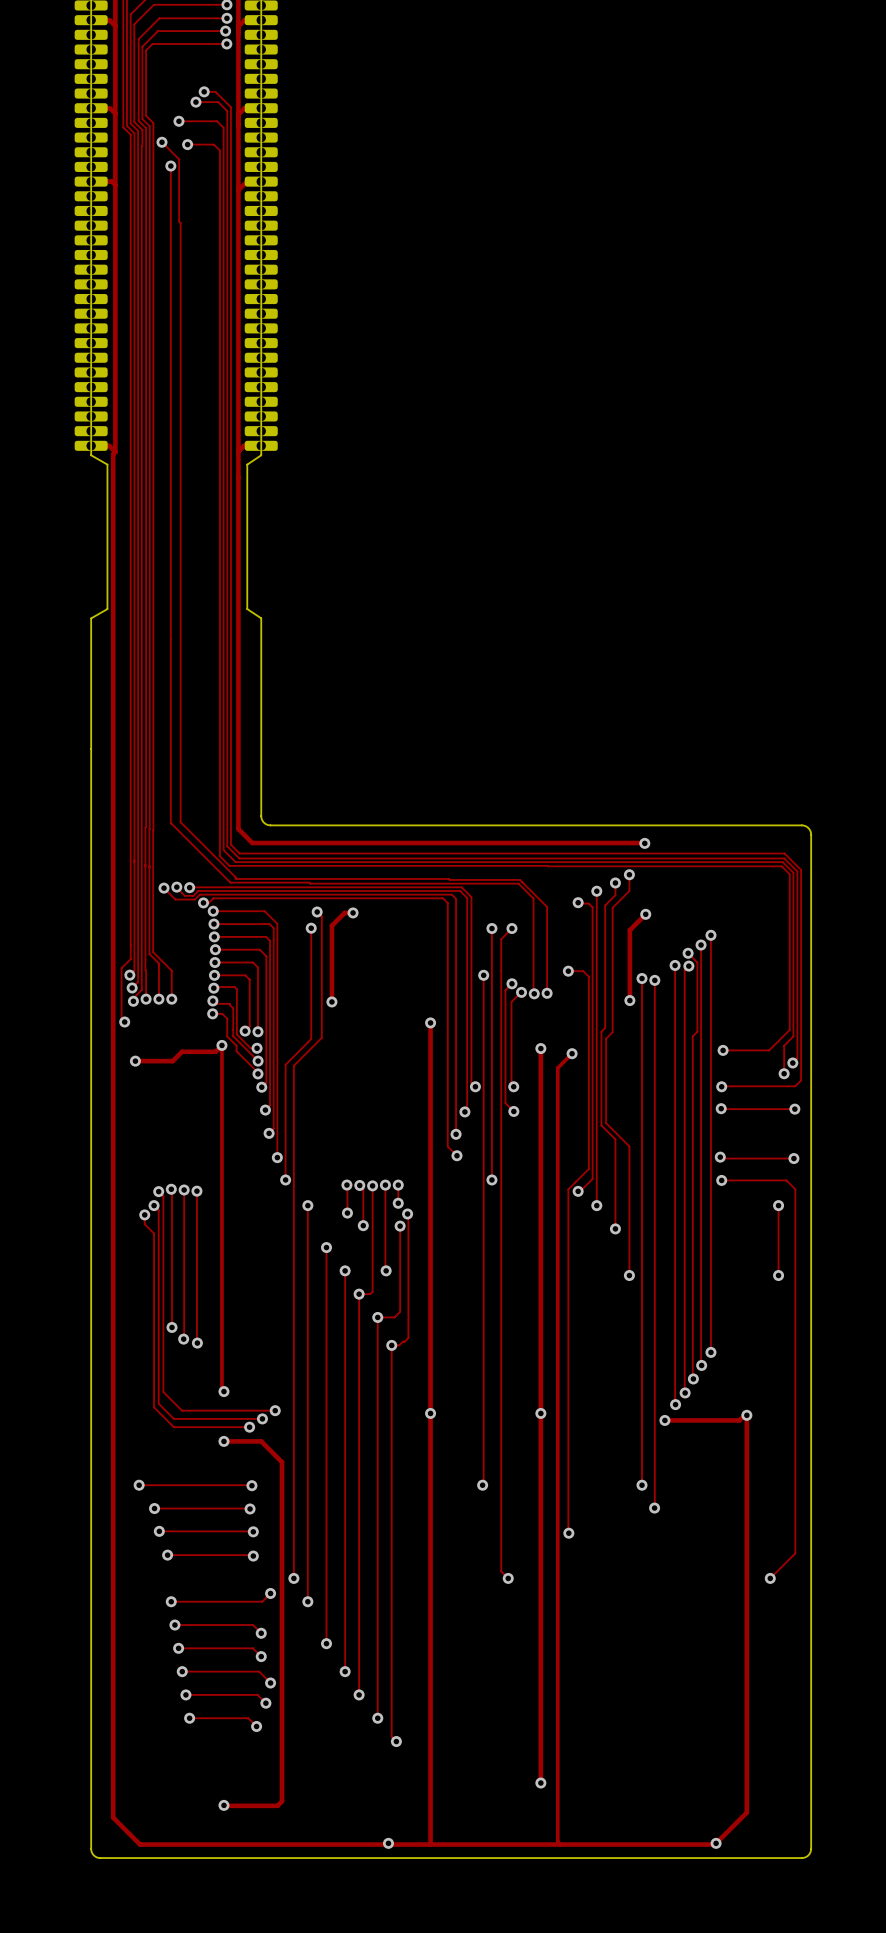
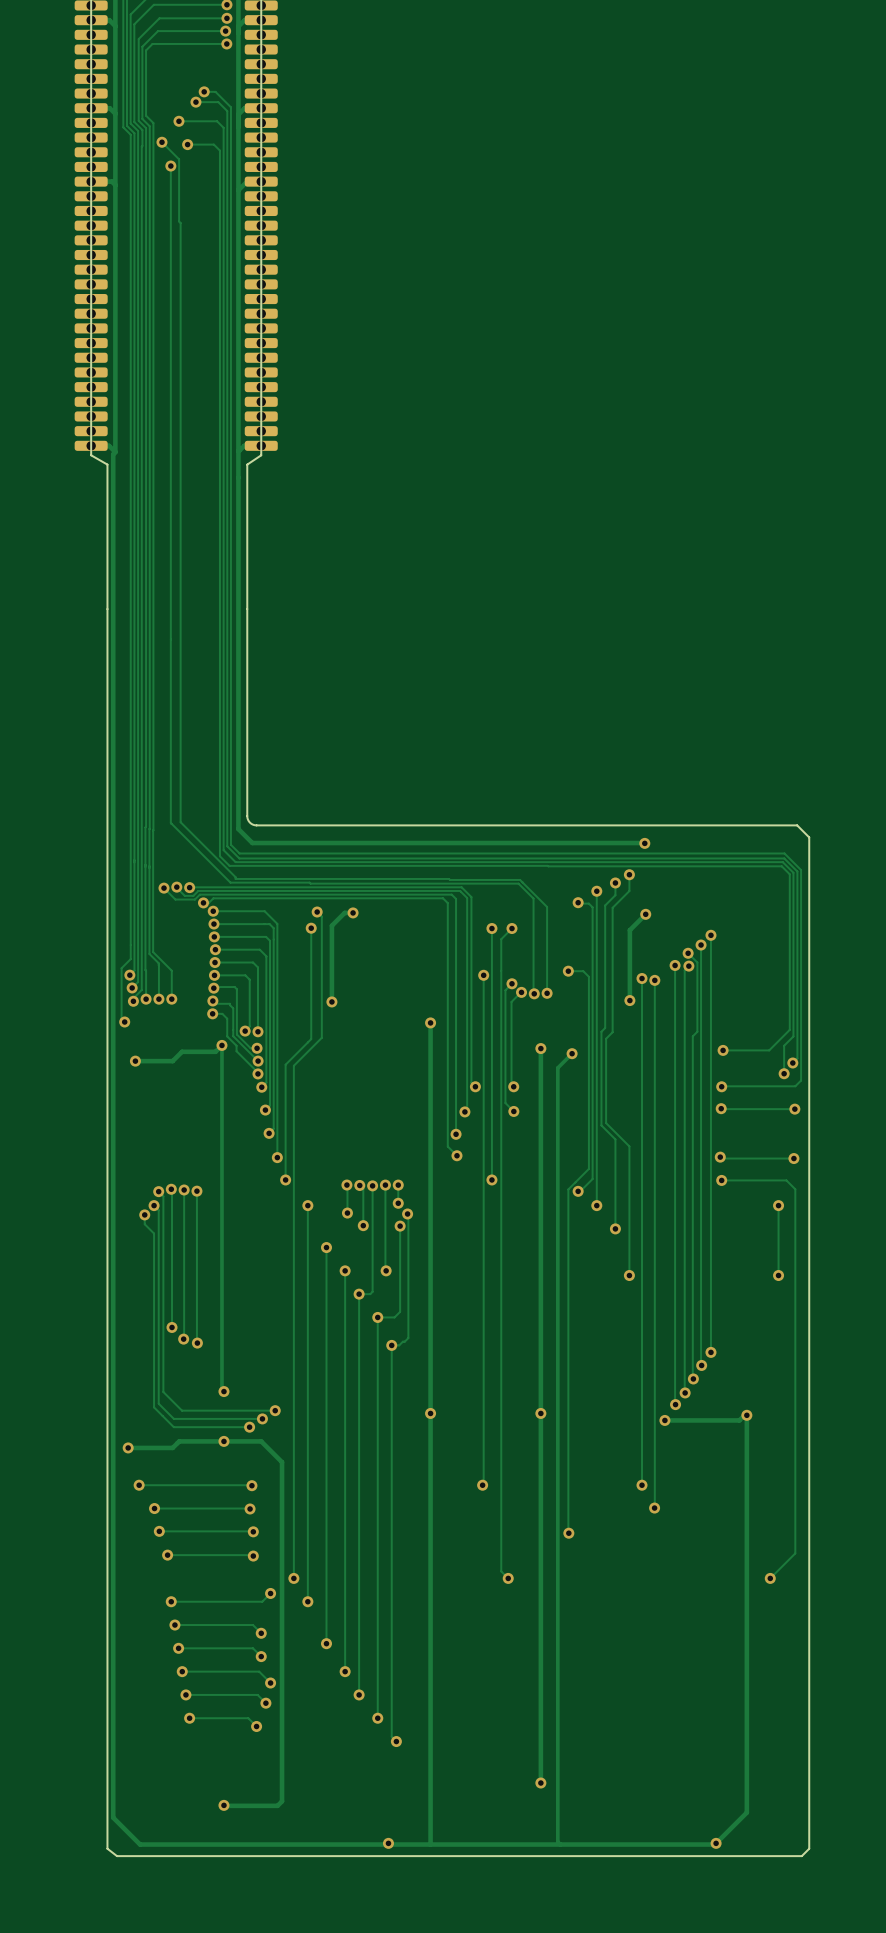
board edge: (107, 609) (91, 618) (91, 1848) (92, 1854) (97, 1857) (801, 1858) (809, 1854) (811, 1848) (811, 834) (806, 826) (797, 825) -> (107, 609) (107, 1848) (116, 1856) (801, 1856) (809, 1848) (809, 837) (797, 825)
board edge: (247, 609) (261, 618) (261, 816) (263, 822) (270, 825) -> (247, 609) (247, 817) (253, 824) (270, 825)
track: none -> (223, 1441) (179, 1441) (172, 1447) (128, 1447)
via: none -> (128, 1447)

